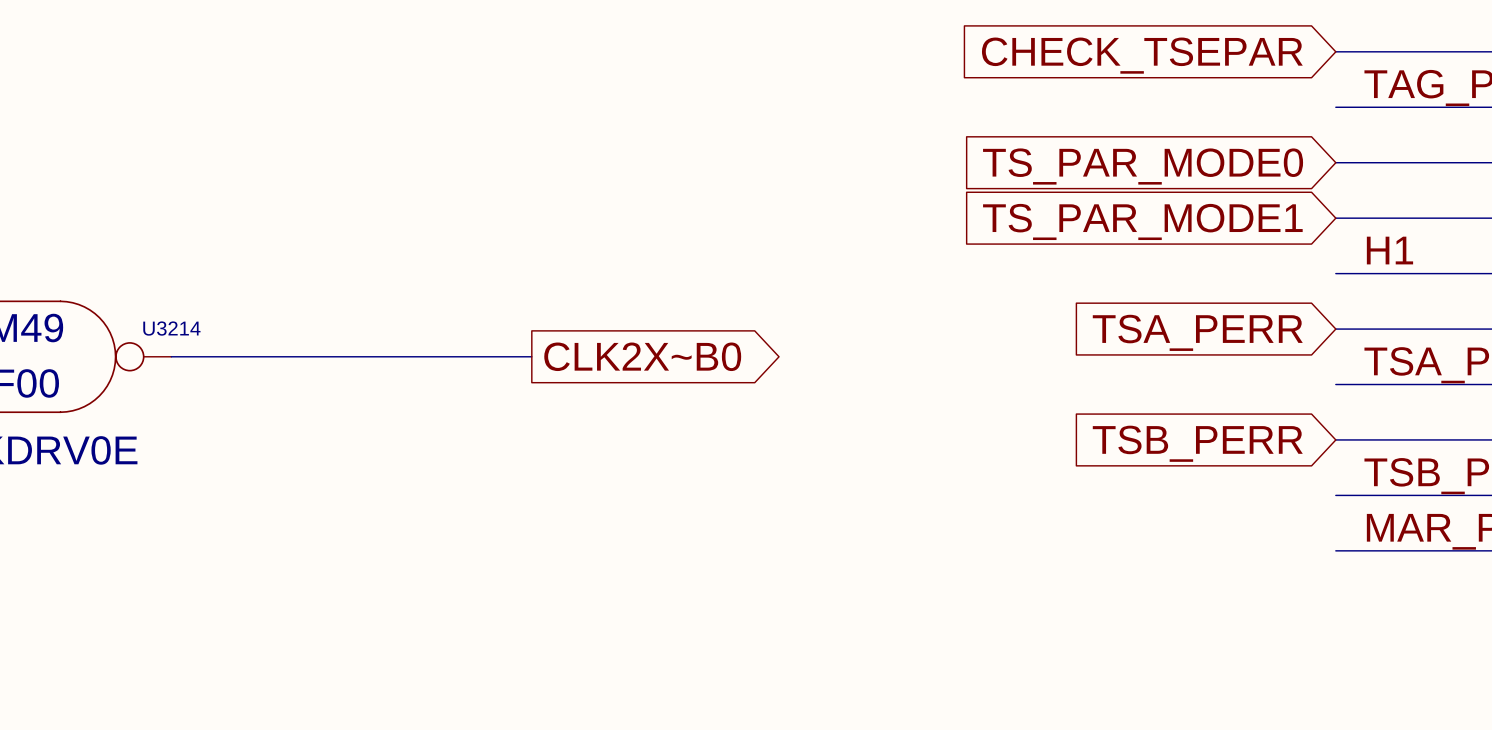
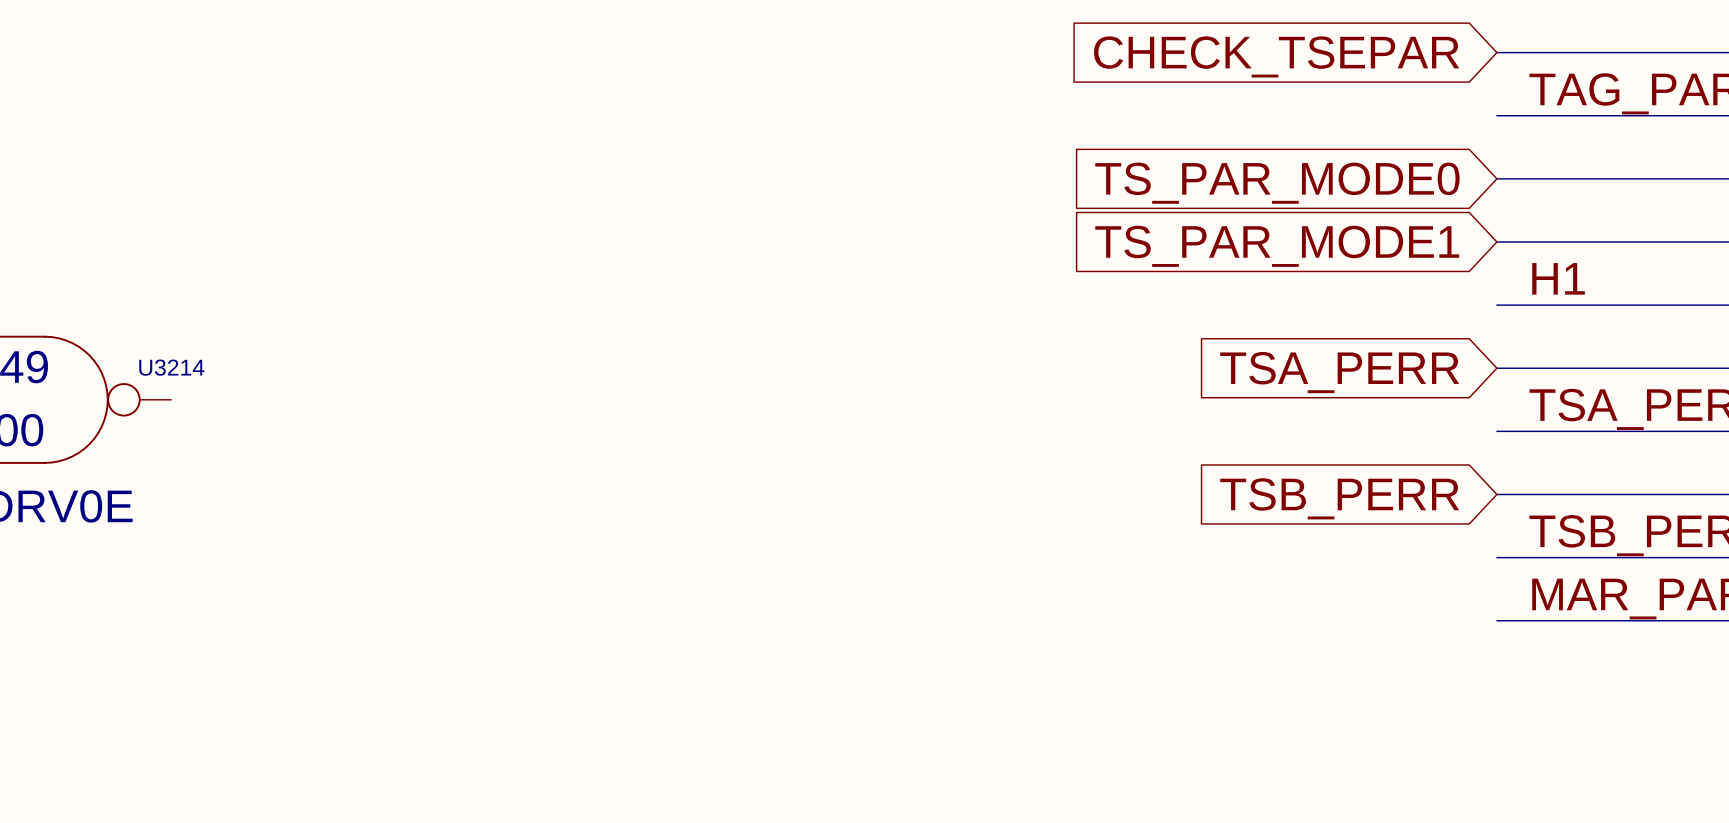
wire: (171, 356) (531, 356) -> none
global label: CLK2X~B0 (642, 356) -> none

